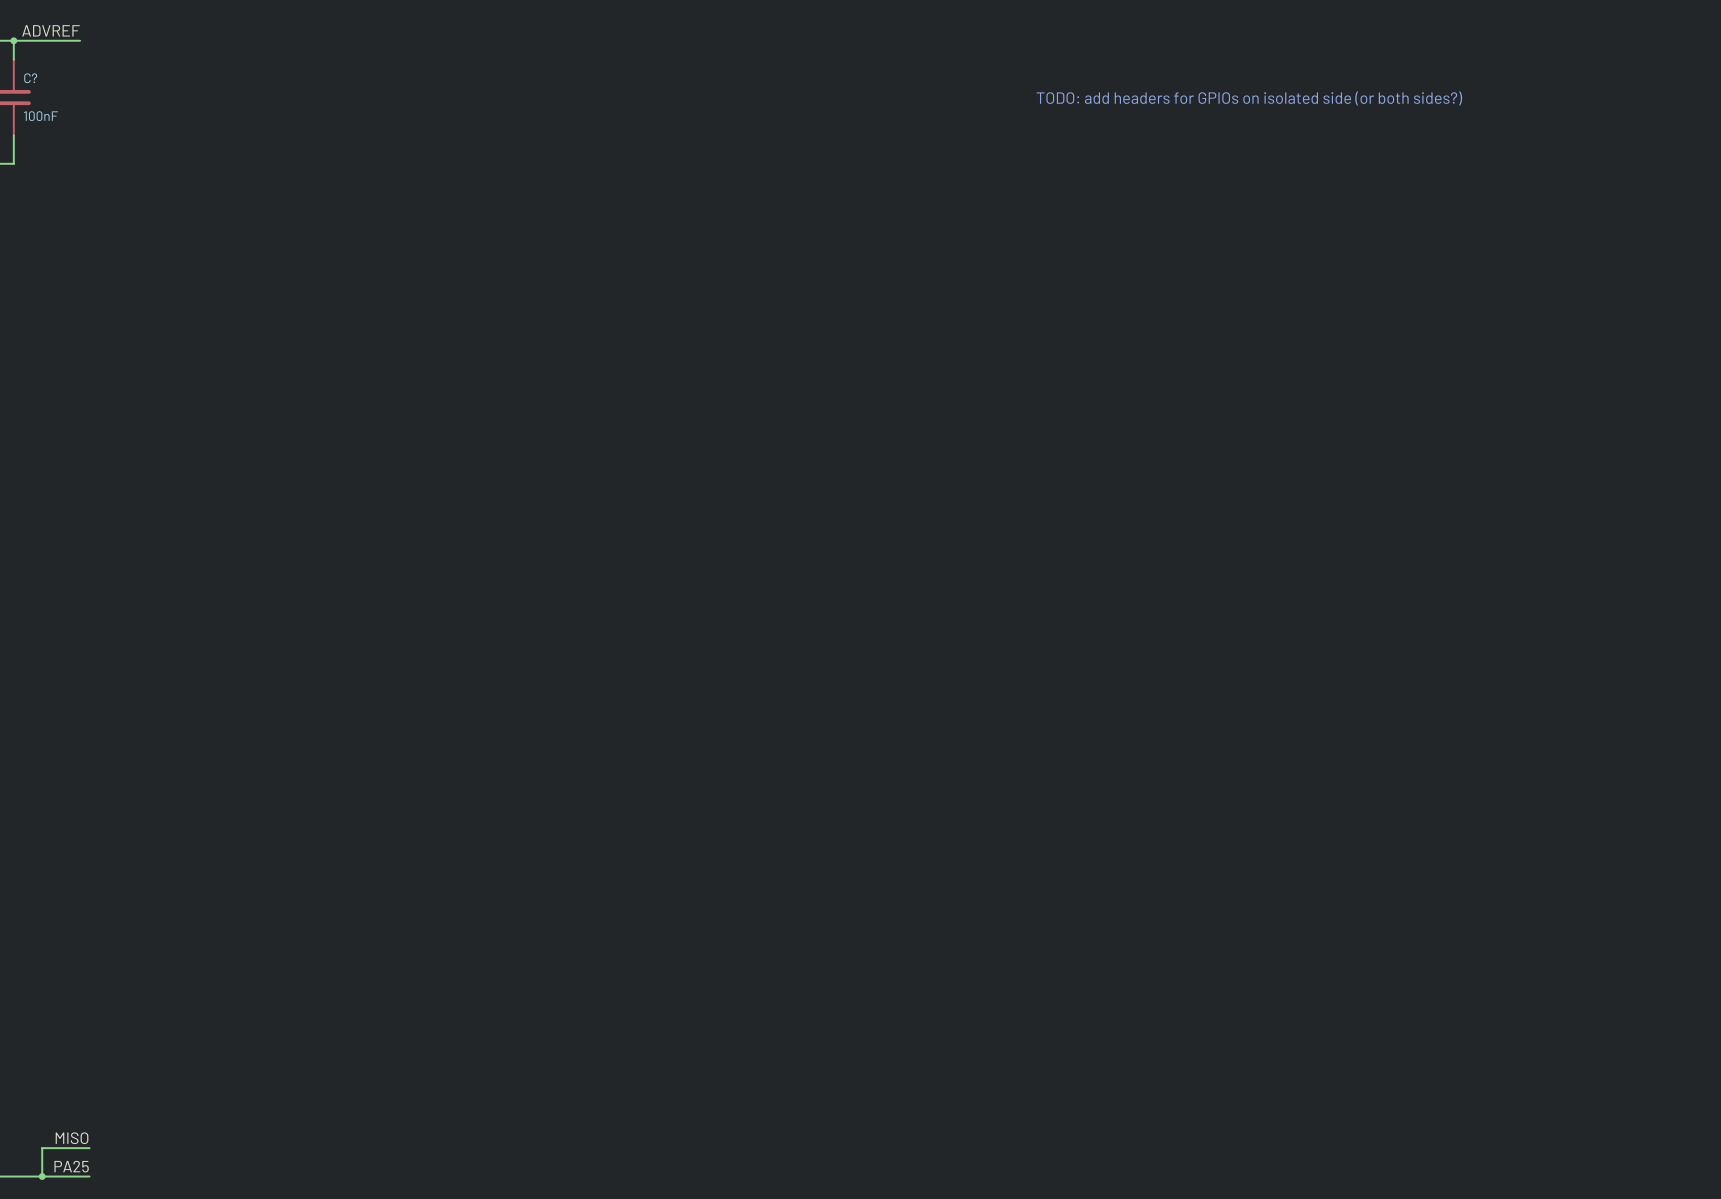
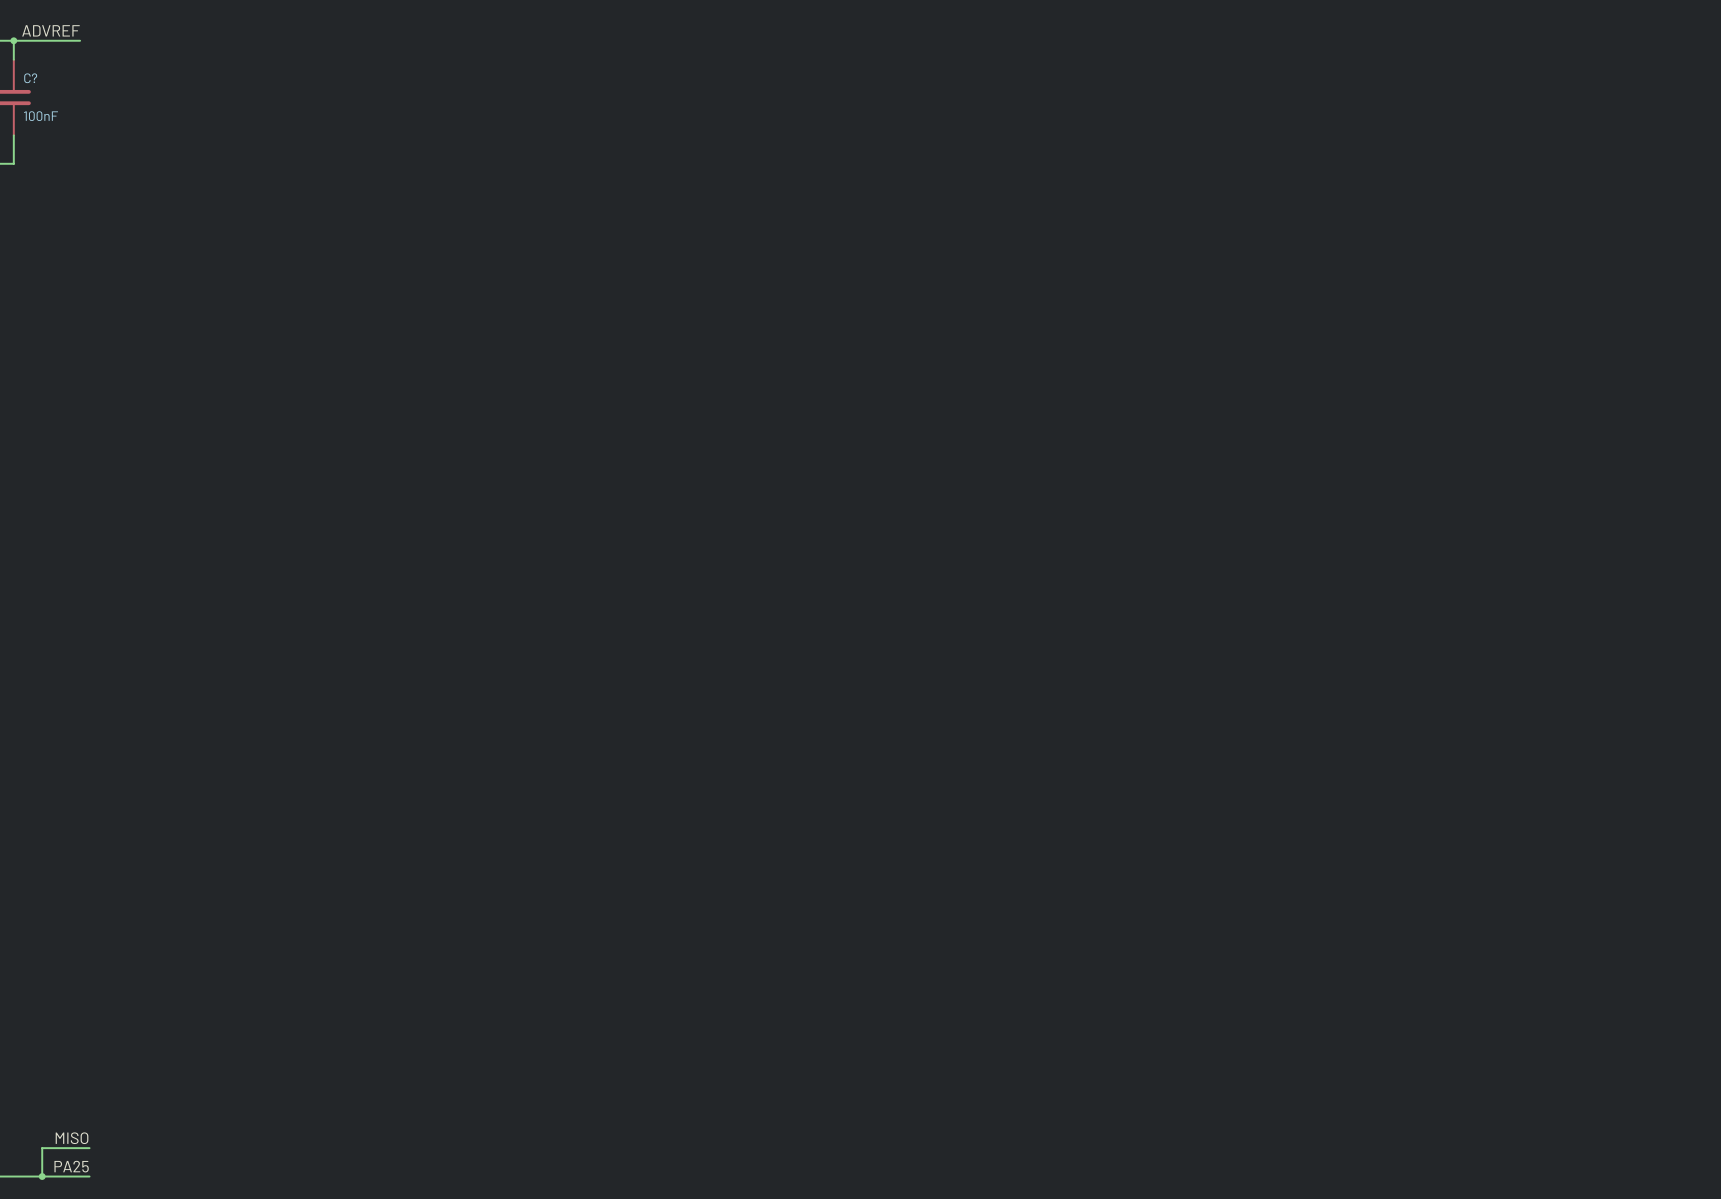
text: TODO: add headers for GPIOs on isolated side (or both sides?) (1249, 98) -> none

